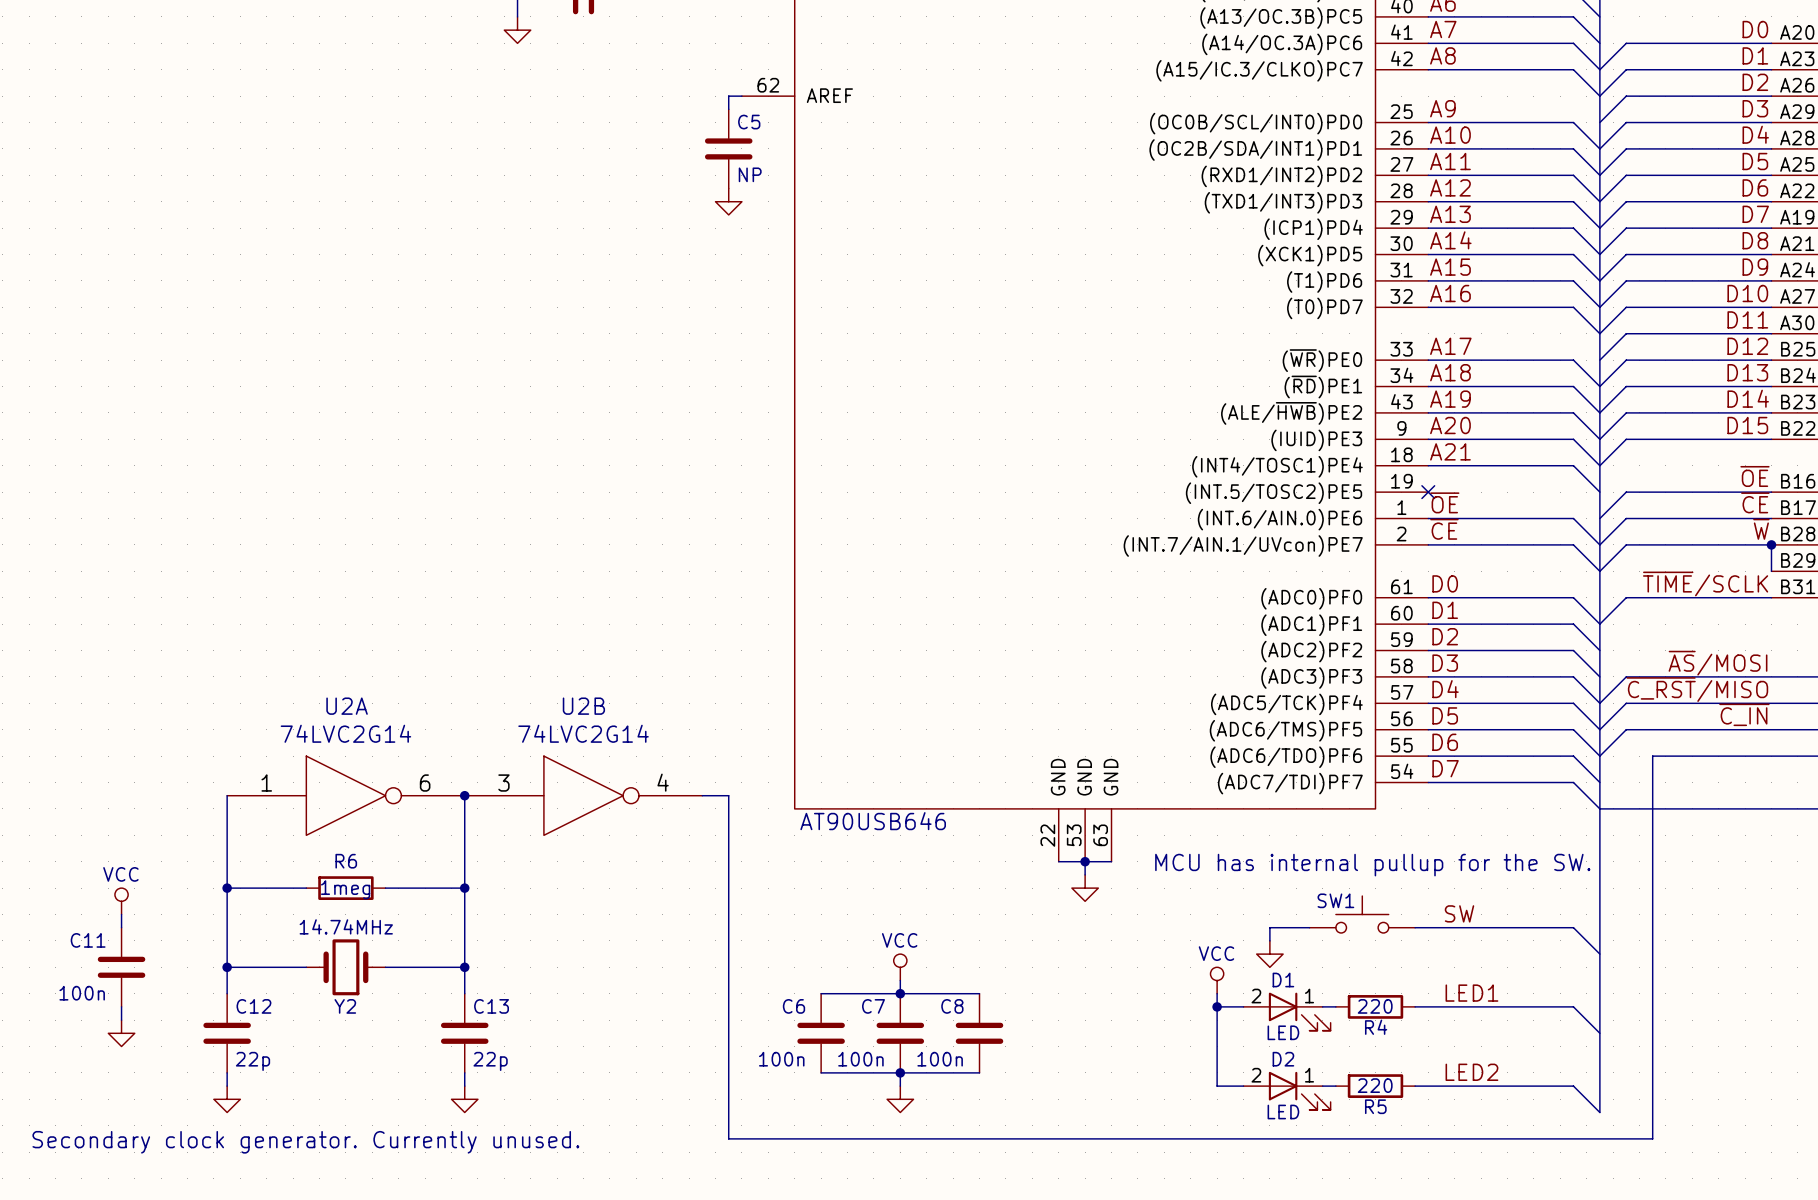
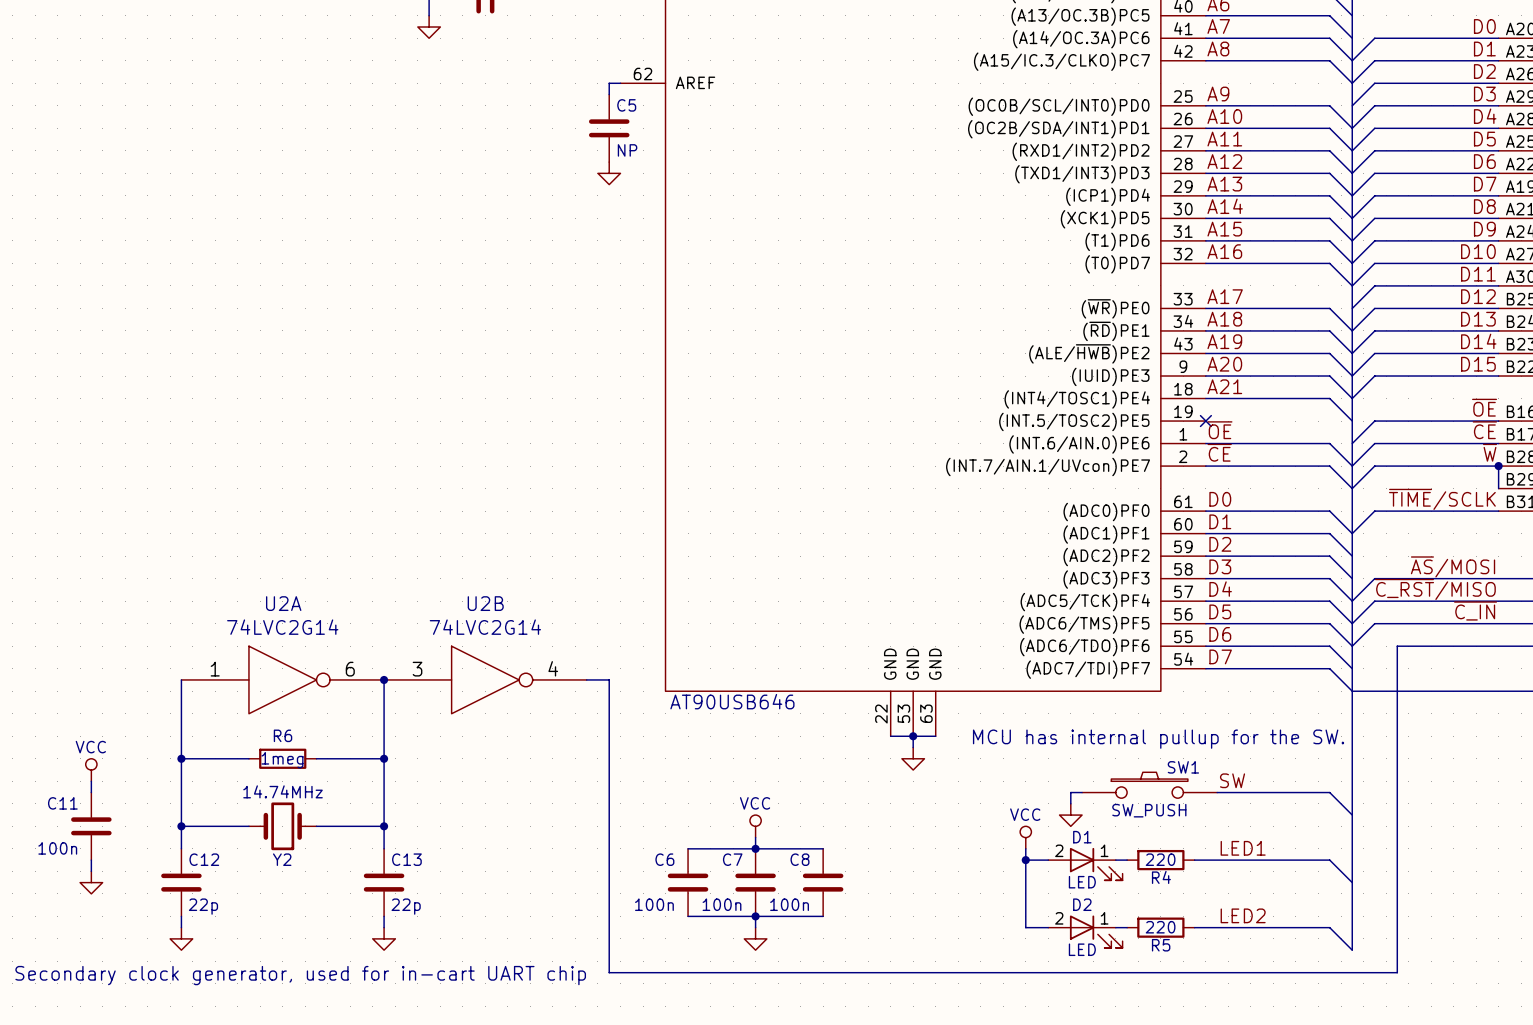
SW1 symbol: [1309, 896, 1416, 933] -> [1082, 772, 1218, 799]
SW1 name position: SW1 (1335, 900) -> SW1 (1183, 767)
SW1 value: none -> SW_PUSH (1149, 810)
text: Secondary clock generator. Currently unused. (305, 1142) -> Secondary clock generator, used for in-cart UART chip (300, 975)

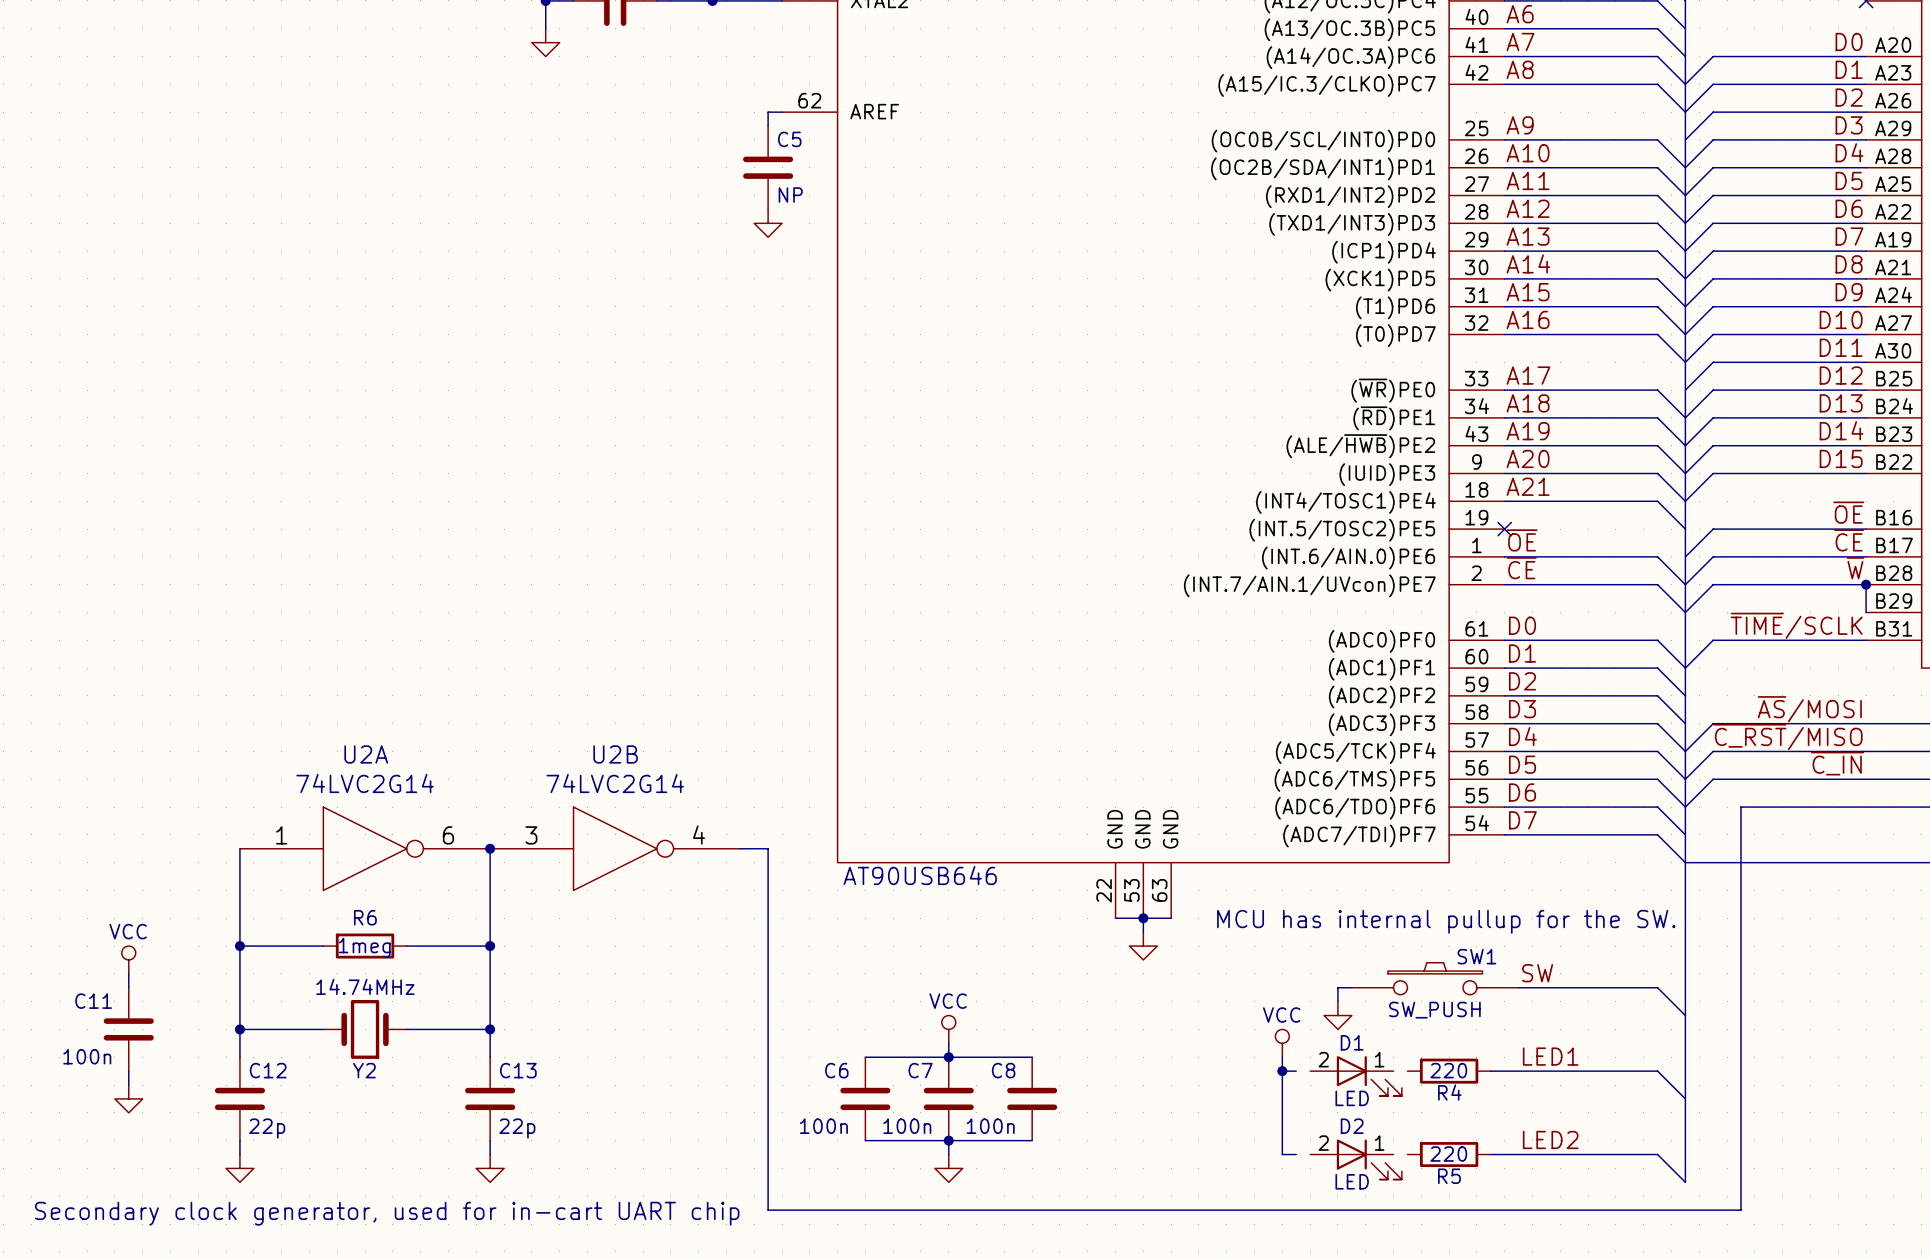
wire: (1037, 860) (1048, 860) -> none
wire: (1115, 860) (1127, 860) -> none
wire: (1037, 927) (1048, 927) -> none
wire: (1115, 927) (1127, 927) -> none

